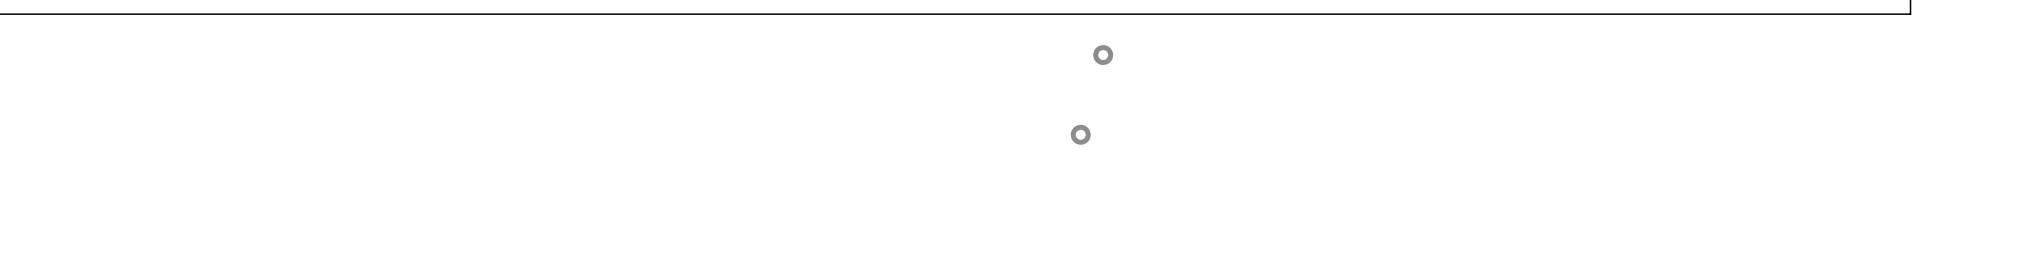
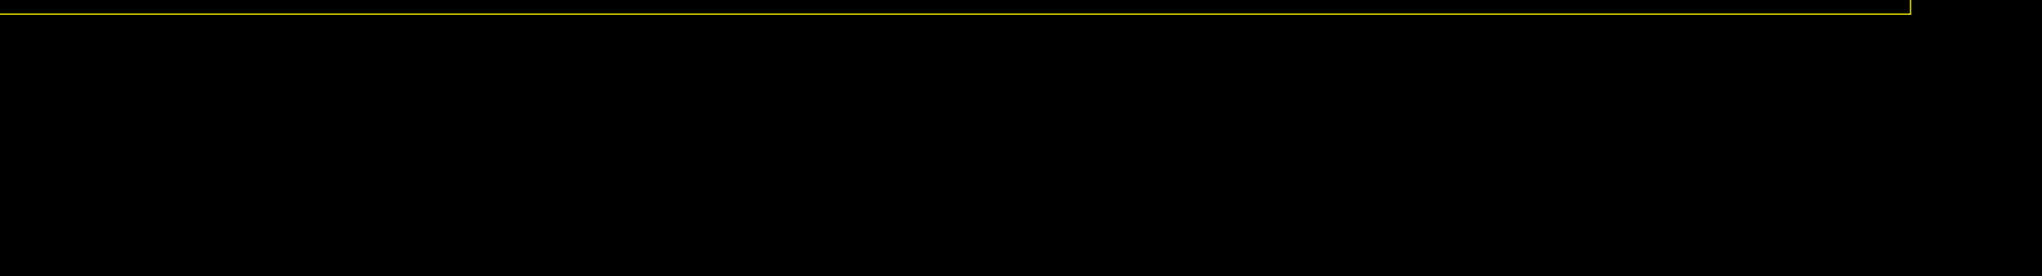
via: (1103, 55) -> none
via: (1080, 134) -> none

